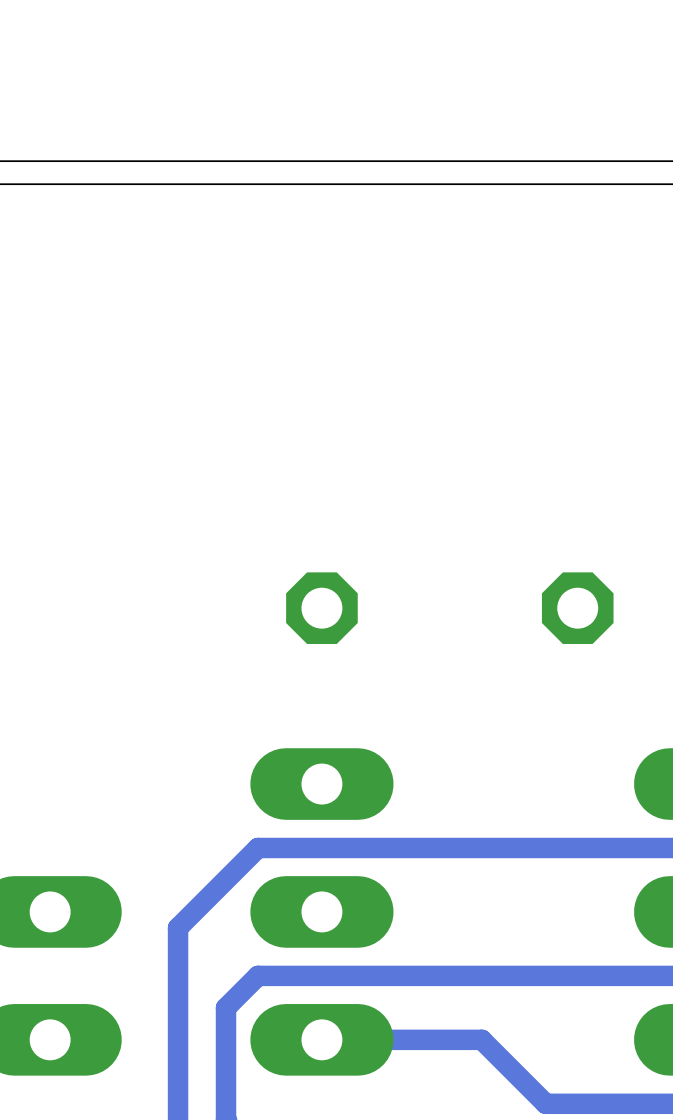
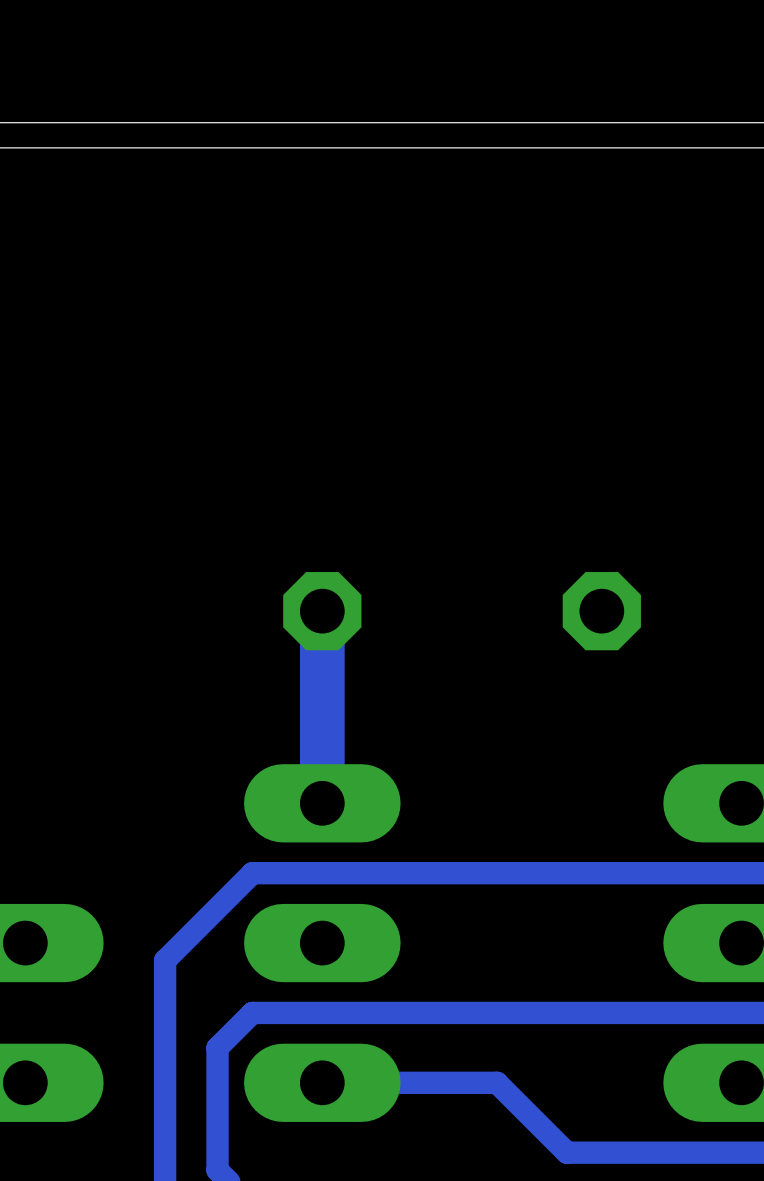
track: none -> (322, 611) (322, 803)

